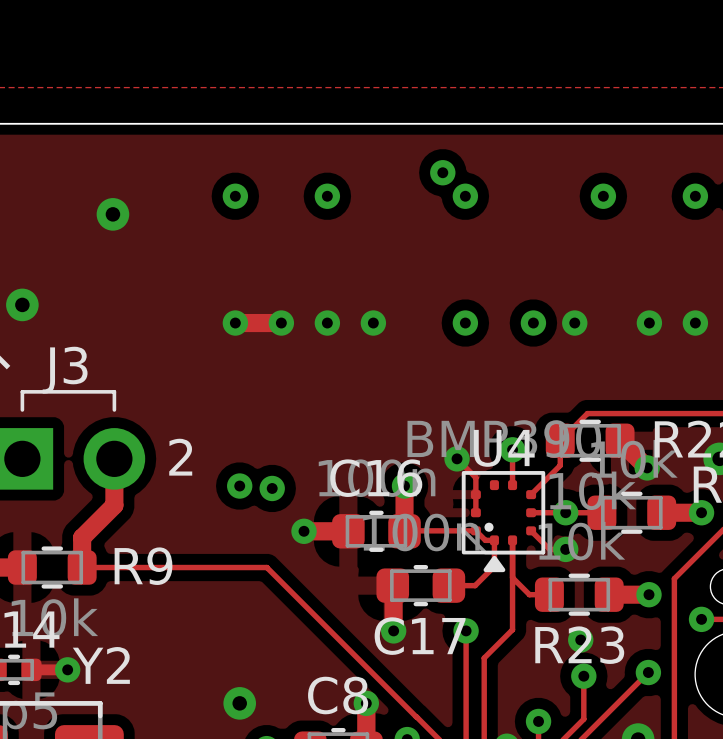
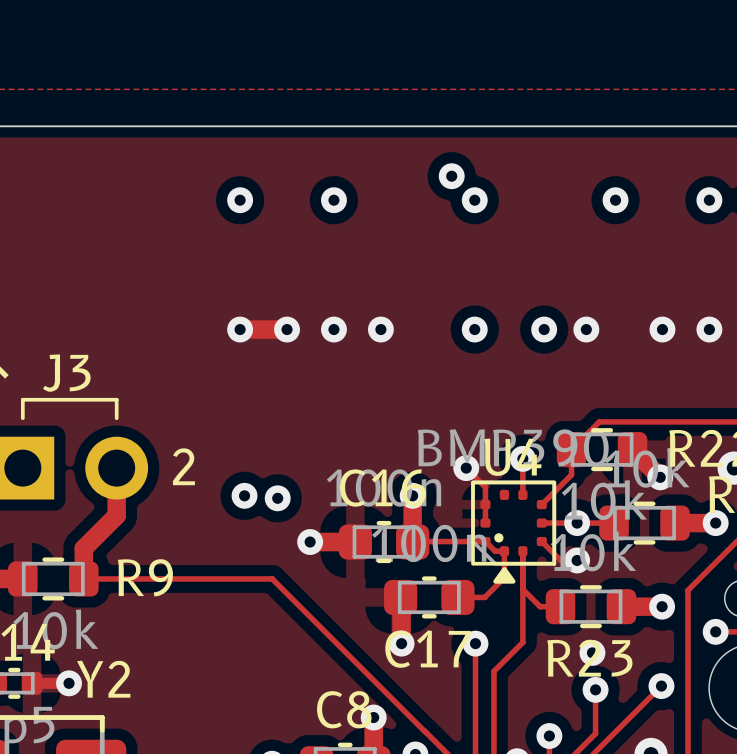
via: (112, 214) -> none
via: (22, 304) -> none
via: (239, 703) -> none

